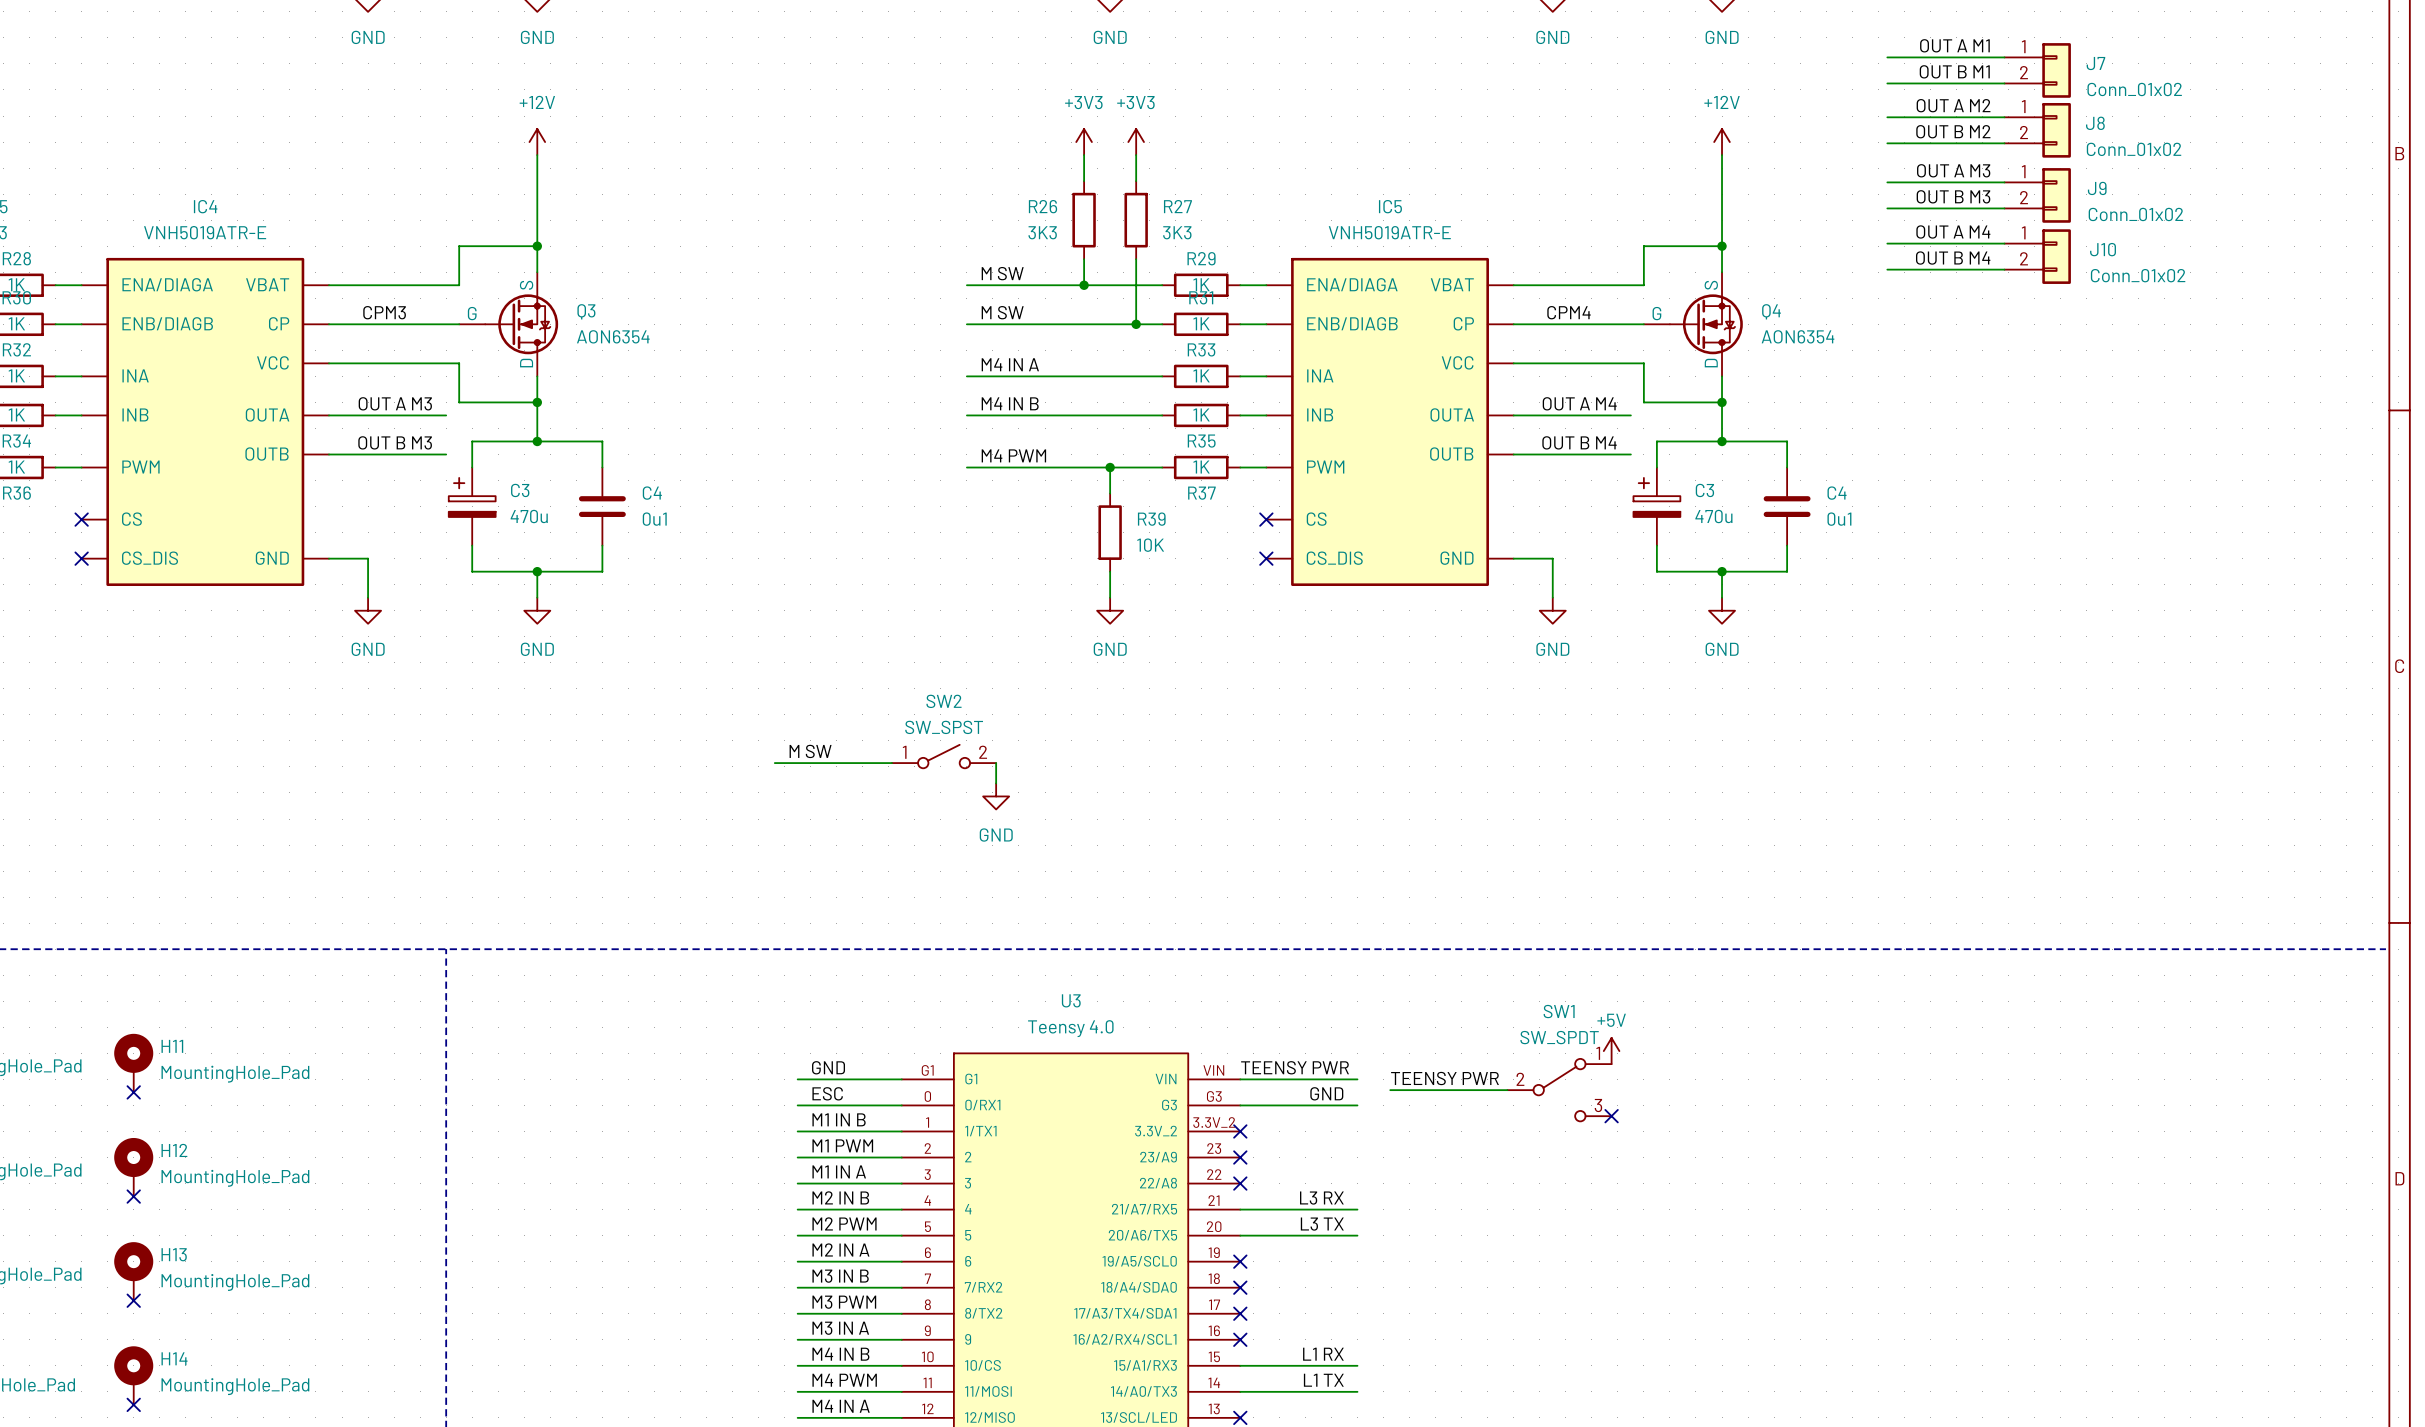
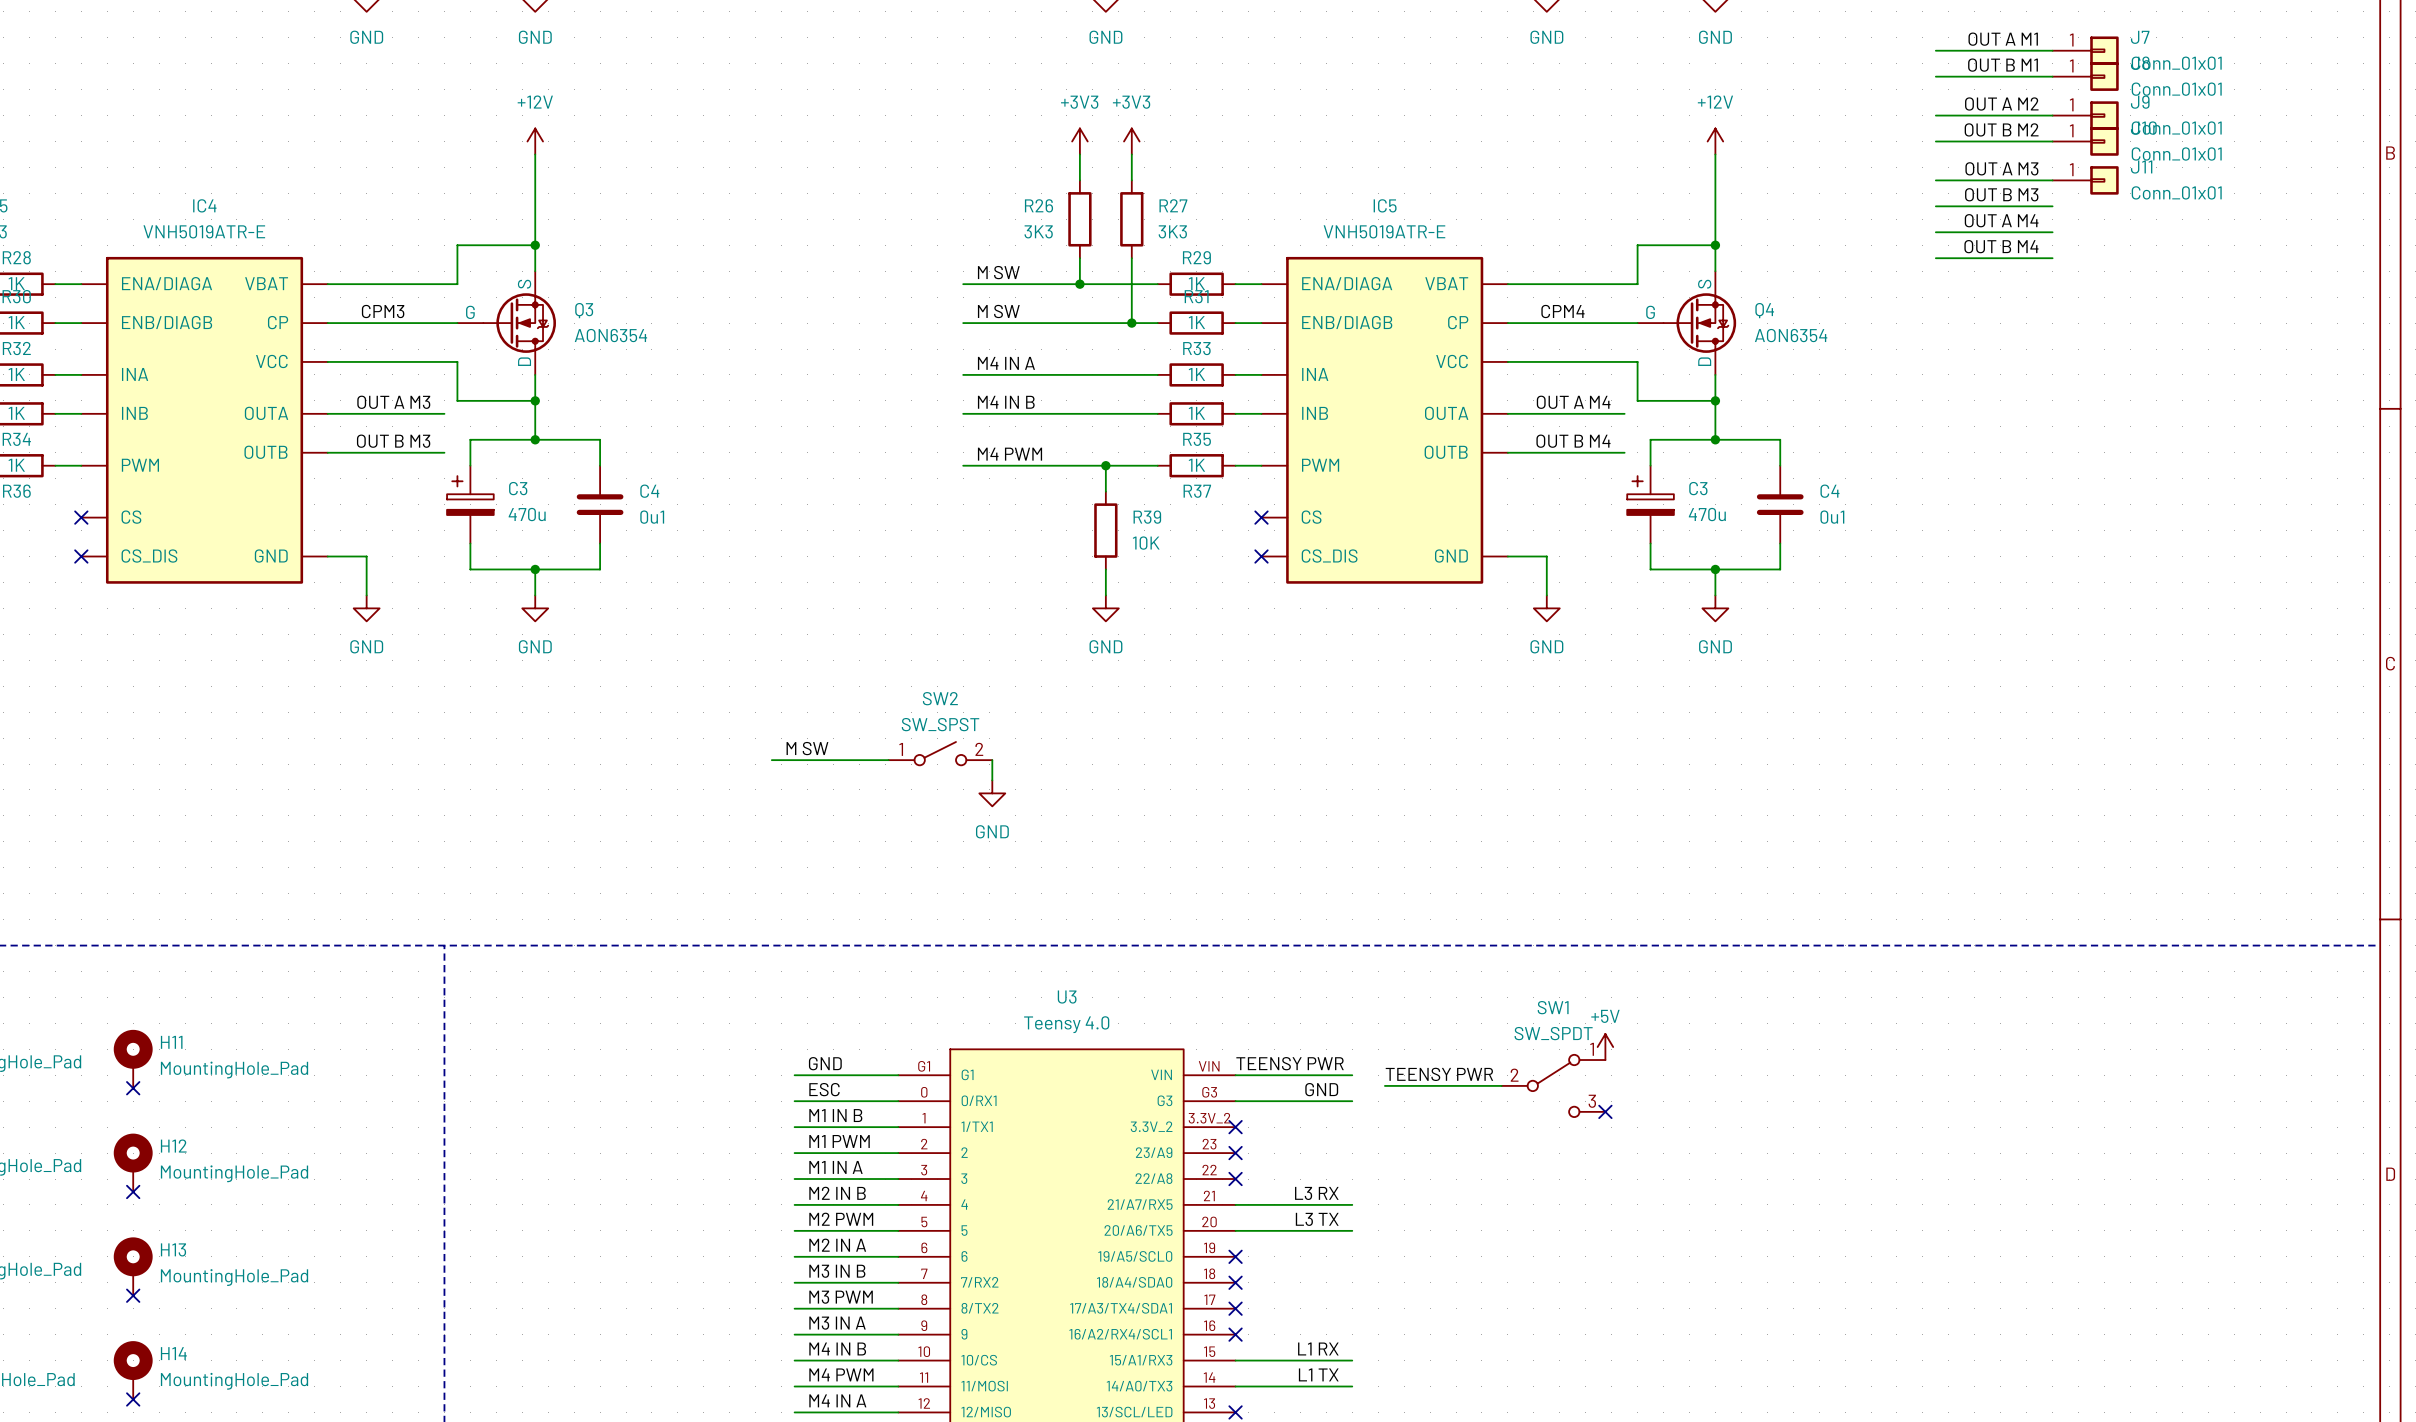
J7 symbol: [2004, 43, 2071, 98] -> [2052, 36, 2119, 65]
label position: OUT A M1 (1954, 45) -> OUT A M1 (2003, 39)
wire: (1887, 57) (2004, 57) -> (1935, 50) (2052, 50)
label position: OUT B M1 (1954, 71) -> OUT B M1 (2003, 65)
wire: (1887, 83) (2004, 83) -> (1935, 76) (2052, 76)
J7 value: Conn_01x02 (2134, 89) -> Conn_01x01 (2176, 63)
J8 symbol: [2004, 102, 2071, 158] -> [2052, 62, 2119, 91]
label position: OUT A M2 (1953, 105) -> OUT A M2 (2001, 103)
wire: (1887, 117) (2004, 117) -> (1935, 115) (2052, 115)
label position: OUT B M2 (1953, 131) -> OUT B M2 (2001, 129)
wire: (1887, 143) (2004, 143) -> (1935, 141) (2052, 141)
J8 value: Conn_01x02 (2134, 149) -> Conn_01x01 (2176, 89)
J9 symbol: [2004, 168, 2071, 223] -> [2052, 101, 2119, 130]
label position: OUT A M3 (1953, 170) -> OUT A M3 (2001, 168)
J11: none -> Conn_01x01 (2085, 180)
wire: (1887, 182) (2004, 182) -> (1935, 180) (2052, 180)
label position: OUT B M3 (1953, 196) -> OUT B M3 (2001, 194)
wire: (1887, 208) (2004, 208) -> (1935, 206) (2052, 206)
J9 value: Conn_01x02 (2135, 214) -> Conn_01x01 (2176, 128)
J10 symbol: [2004, 229, 2071, 284] -> [2052, 127, 2119, 156]
label position: OUT A M4 (1953, 231) -> OUT A M4 (2001, 220)
wire: (1887, 243) (2004, 243) -> (1935, 232) (2052, 232)
label position: OUT B M4 (1953, 258) -> OUT B M4 (2001, 246)
wire: (1887, 269) (2004, 269) -> (1935, 258) (2052, 258)
J10 value: Conn_01x02 (2138, 275) -> Conn_01x01 (2176, 153)

